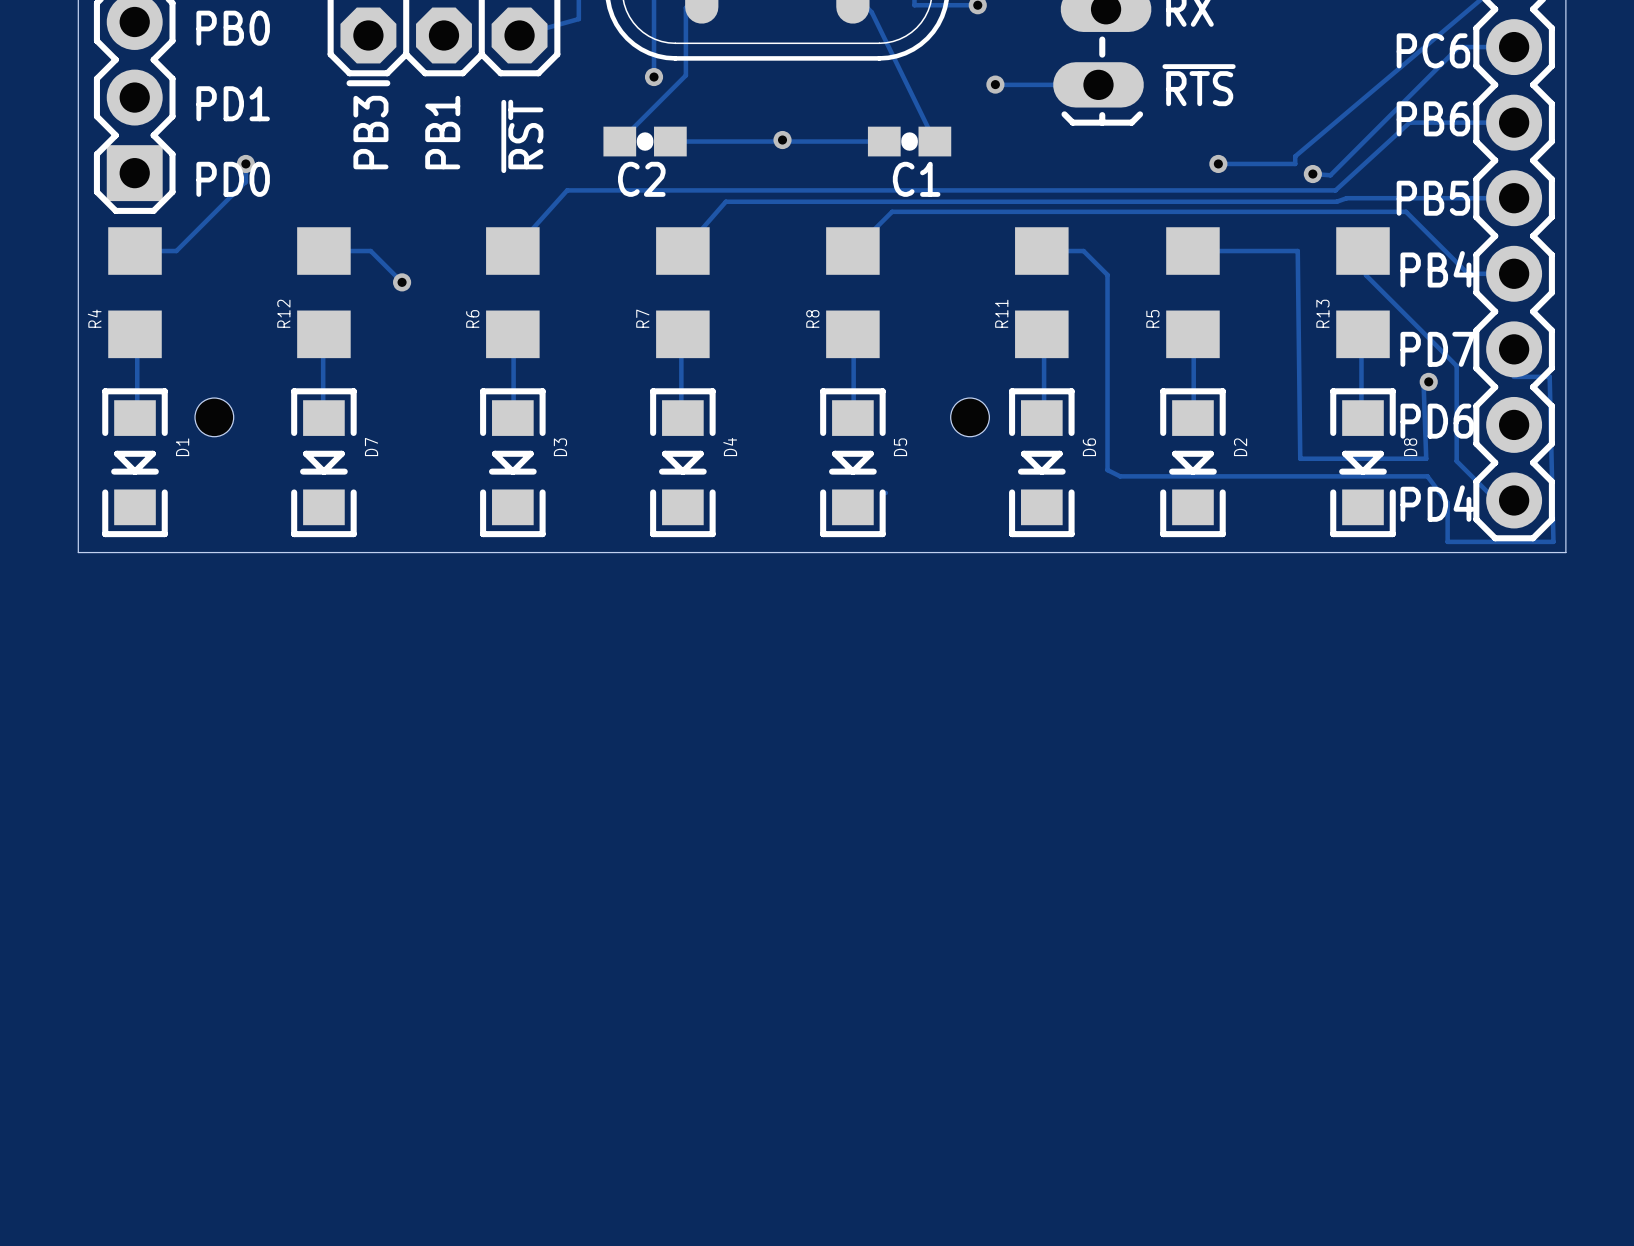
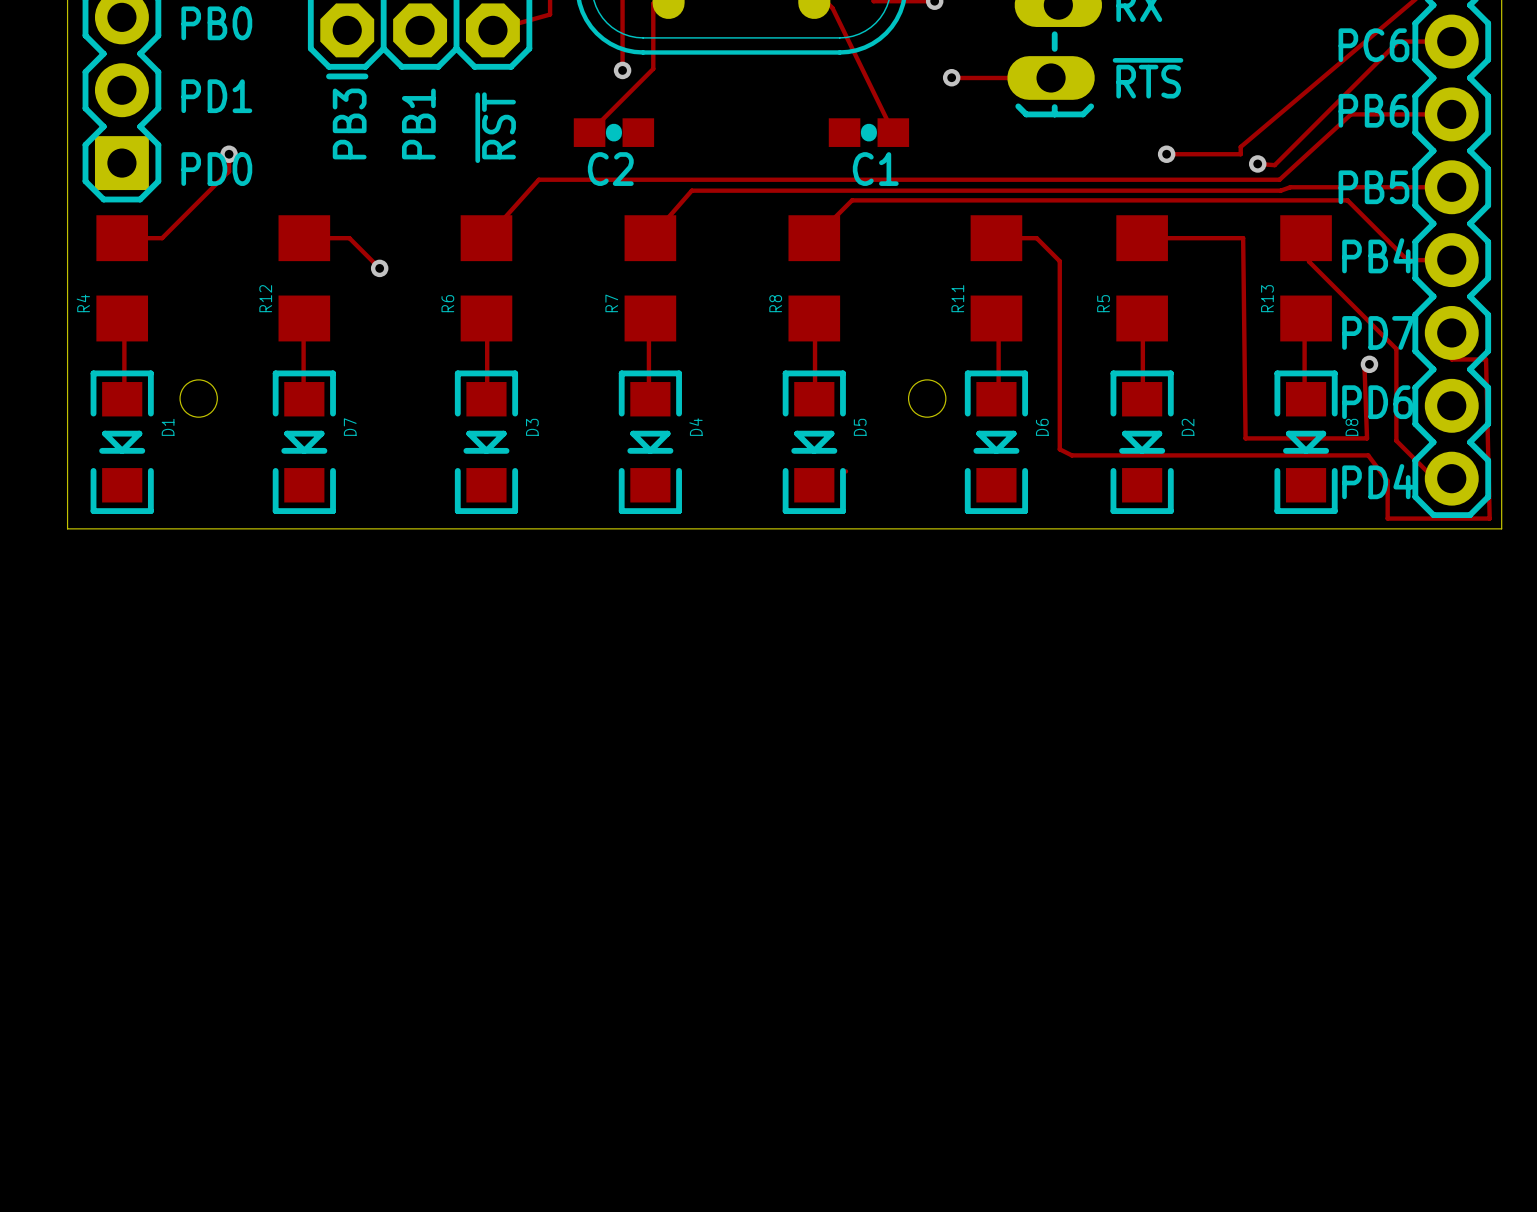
via: (782, 140) -> none
track: (670, 141) (782, 140) (884, 141) -> none

